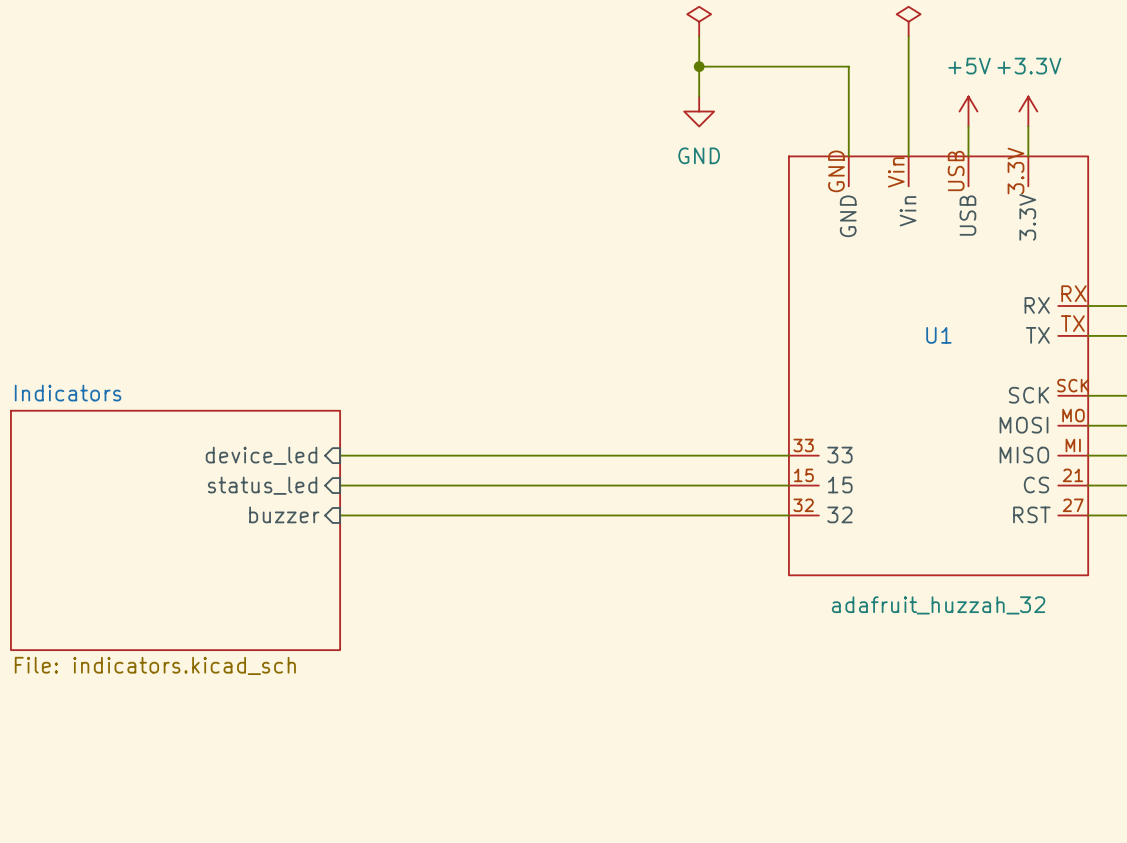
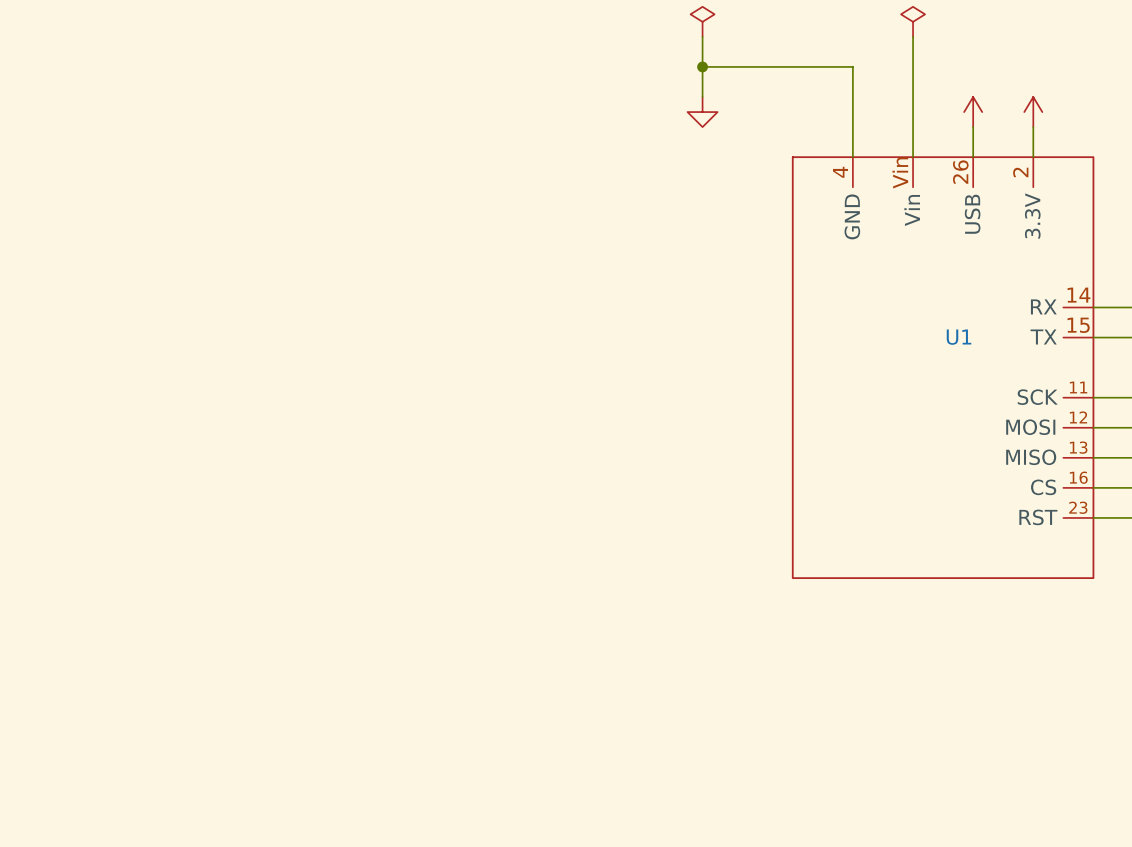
power symbol text: +5V (969, 66) -> none
power symbol text: +3.3V (1029, 66) -> none
power symbol text: GND (699, 155) -> none
U1 symbol: [788, 155, 1090, 577] -> [791, 156, 1095, 580]
sheet pin: device_led (261, 455) -> none
wire: (340, 455) (788, 455) -> none
sheet pin: status_led (262, 485) -> none
wire: (340, 485) (788, 485) -> none
sheet pin: buzzer (284, 514) -> none
wire: (340, 515) (788, 515) -> none
sheet Indicators: File: indicators.kicad_sch (175, 530) -> none
U1 value: adafruit_huzzah_32 (938, 605) -> none

